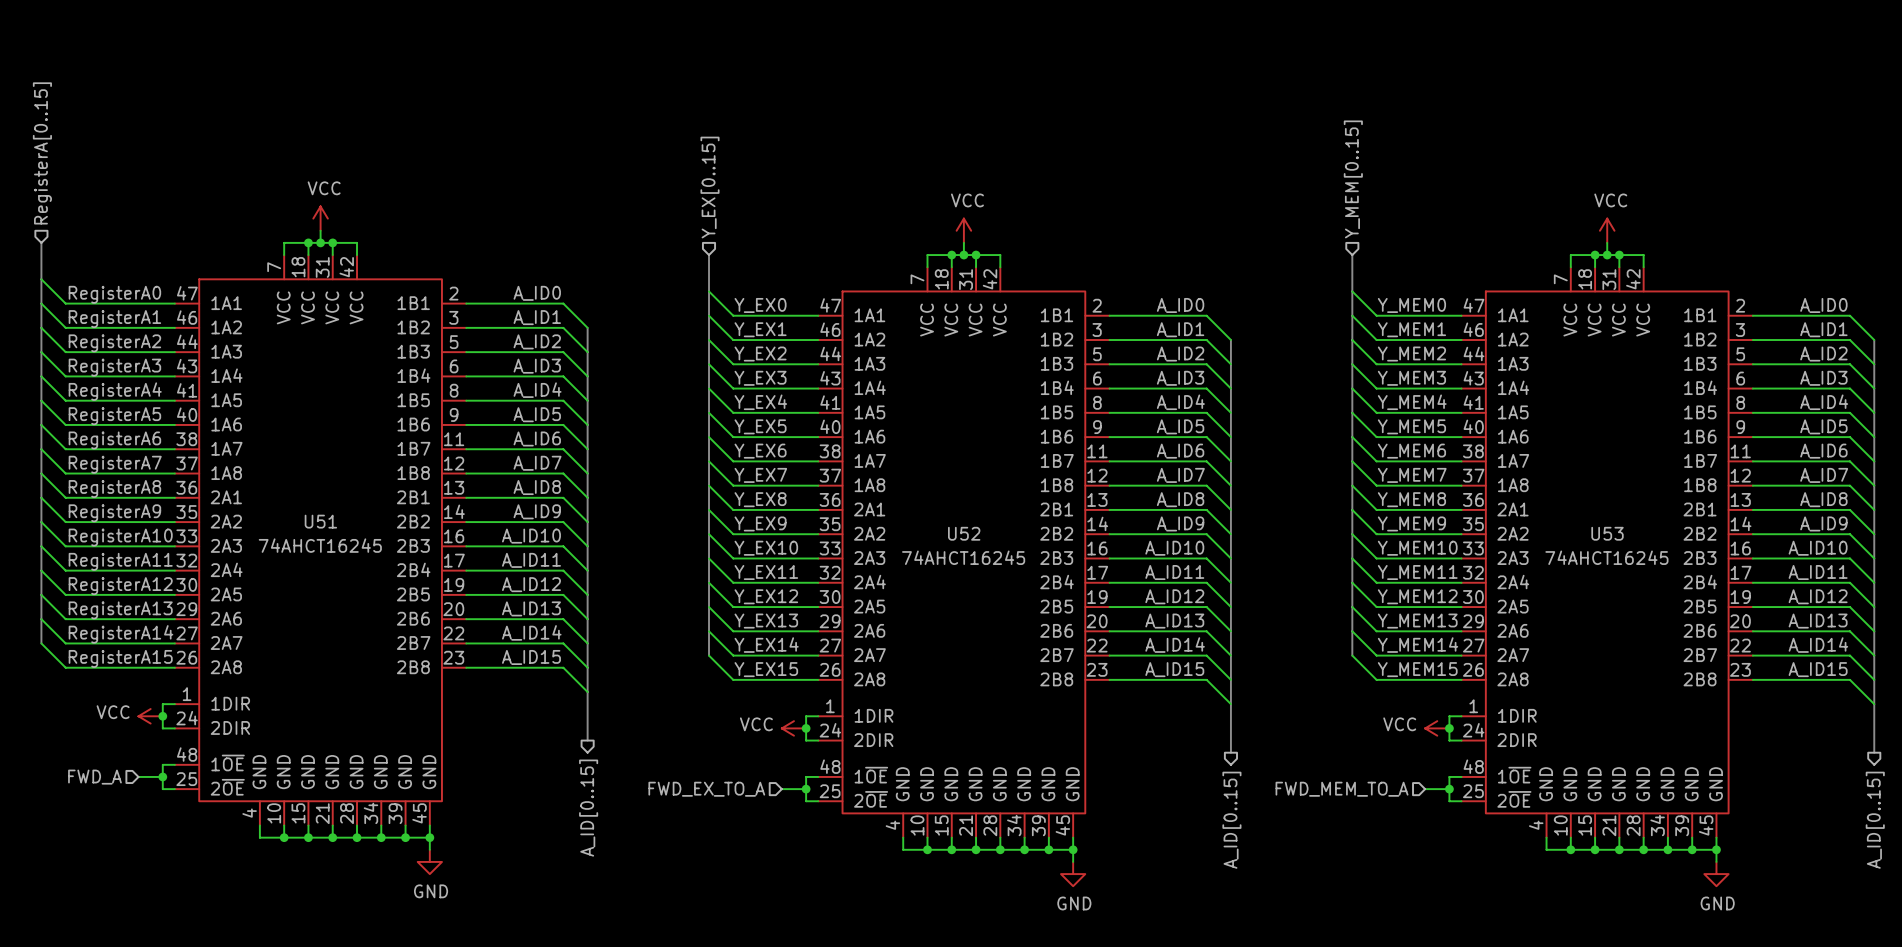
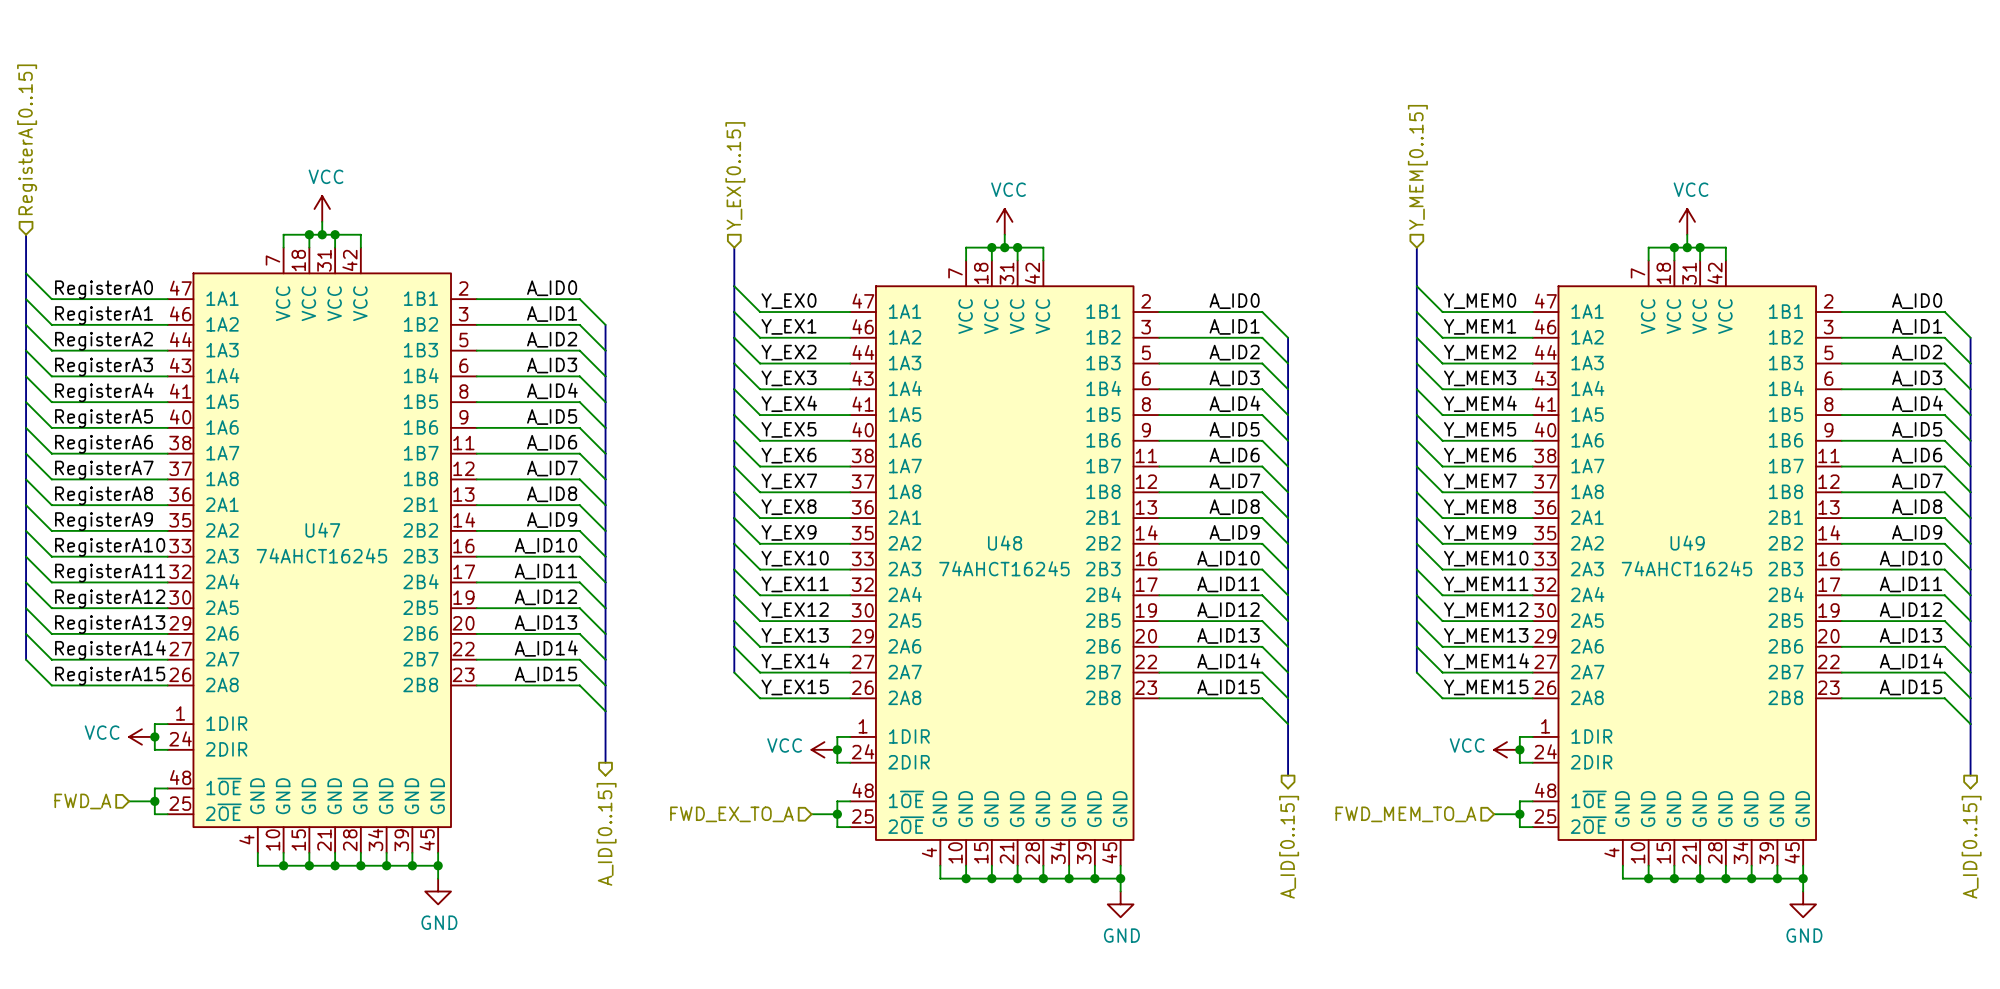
U51 name: U51 (320, 521) -> U47 (322, 530)
U52 name: U52 (964, 533) -> U48 (1005, 543)
U53 name: U53 (1607, 533) -> U49 (1687, 543)

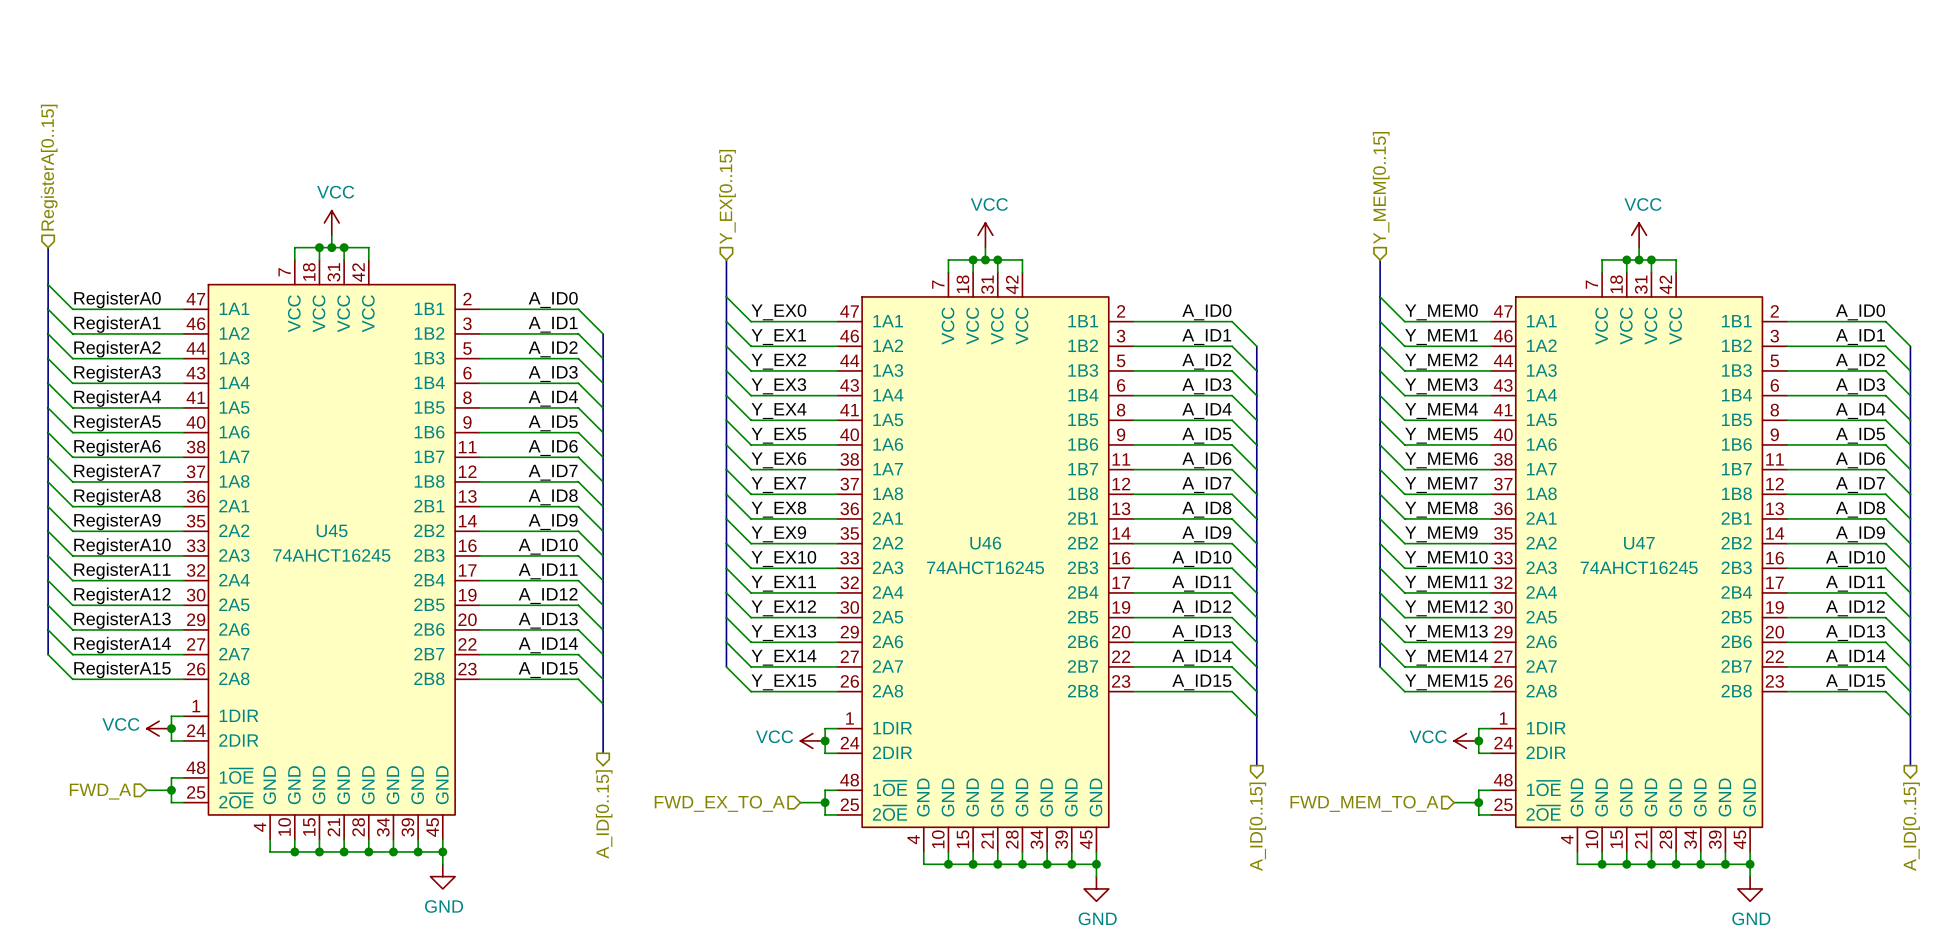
U47 name: U47 (322, 530) -> U45 (332, 530)
U48 name: U48 (1005, 543) -> U46 (985, 543)
U49 name: U49 (1687, 543) -> U47 (1639, 543)

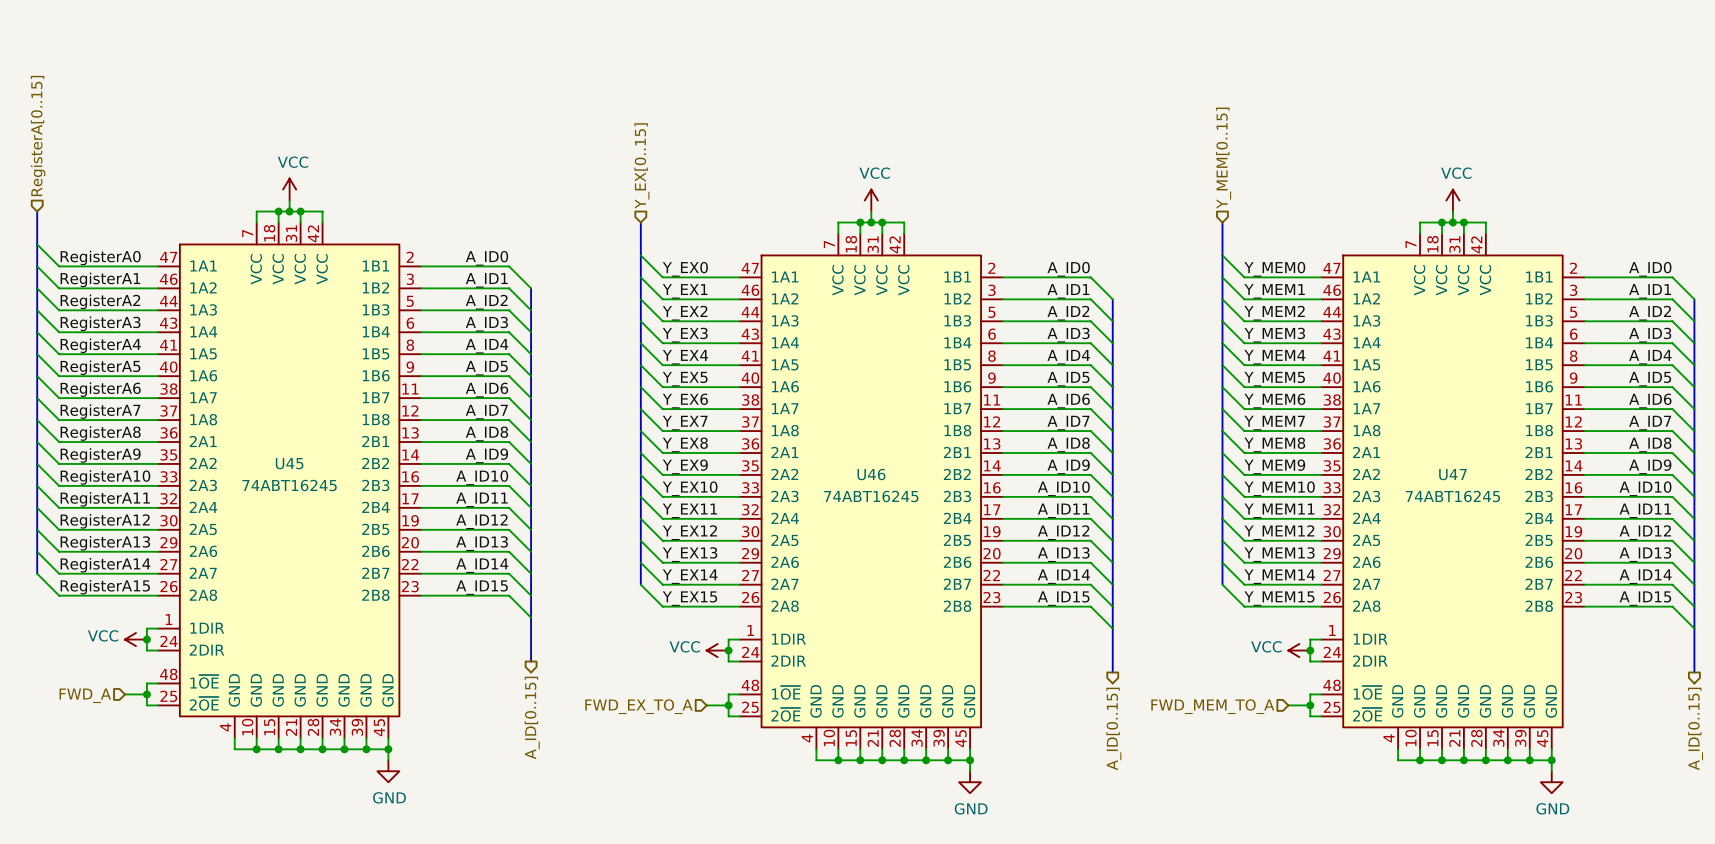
U45 value: 74AHCT16245 (331, 555) -> 74ABT16245 (289, 485)
U46 value: 74AHCT16245 (985, 567) -> 74ABT16245 (871, 496)
U47 value: 74AHCT16245 (1639, 567) -> 74ABT16245 (1452, 496)

